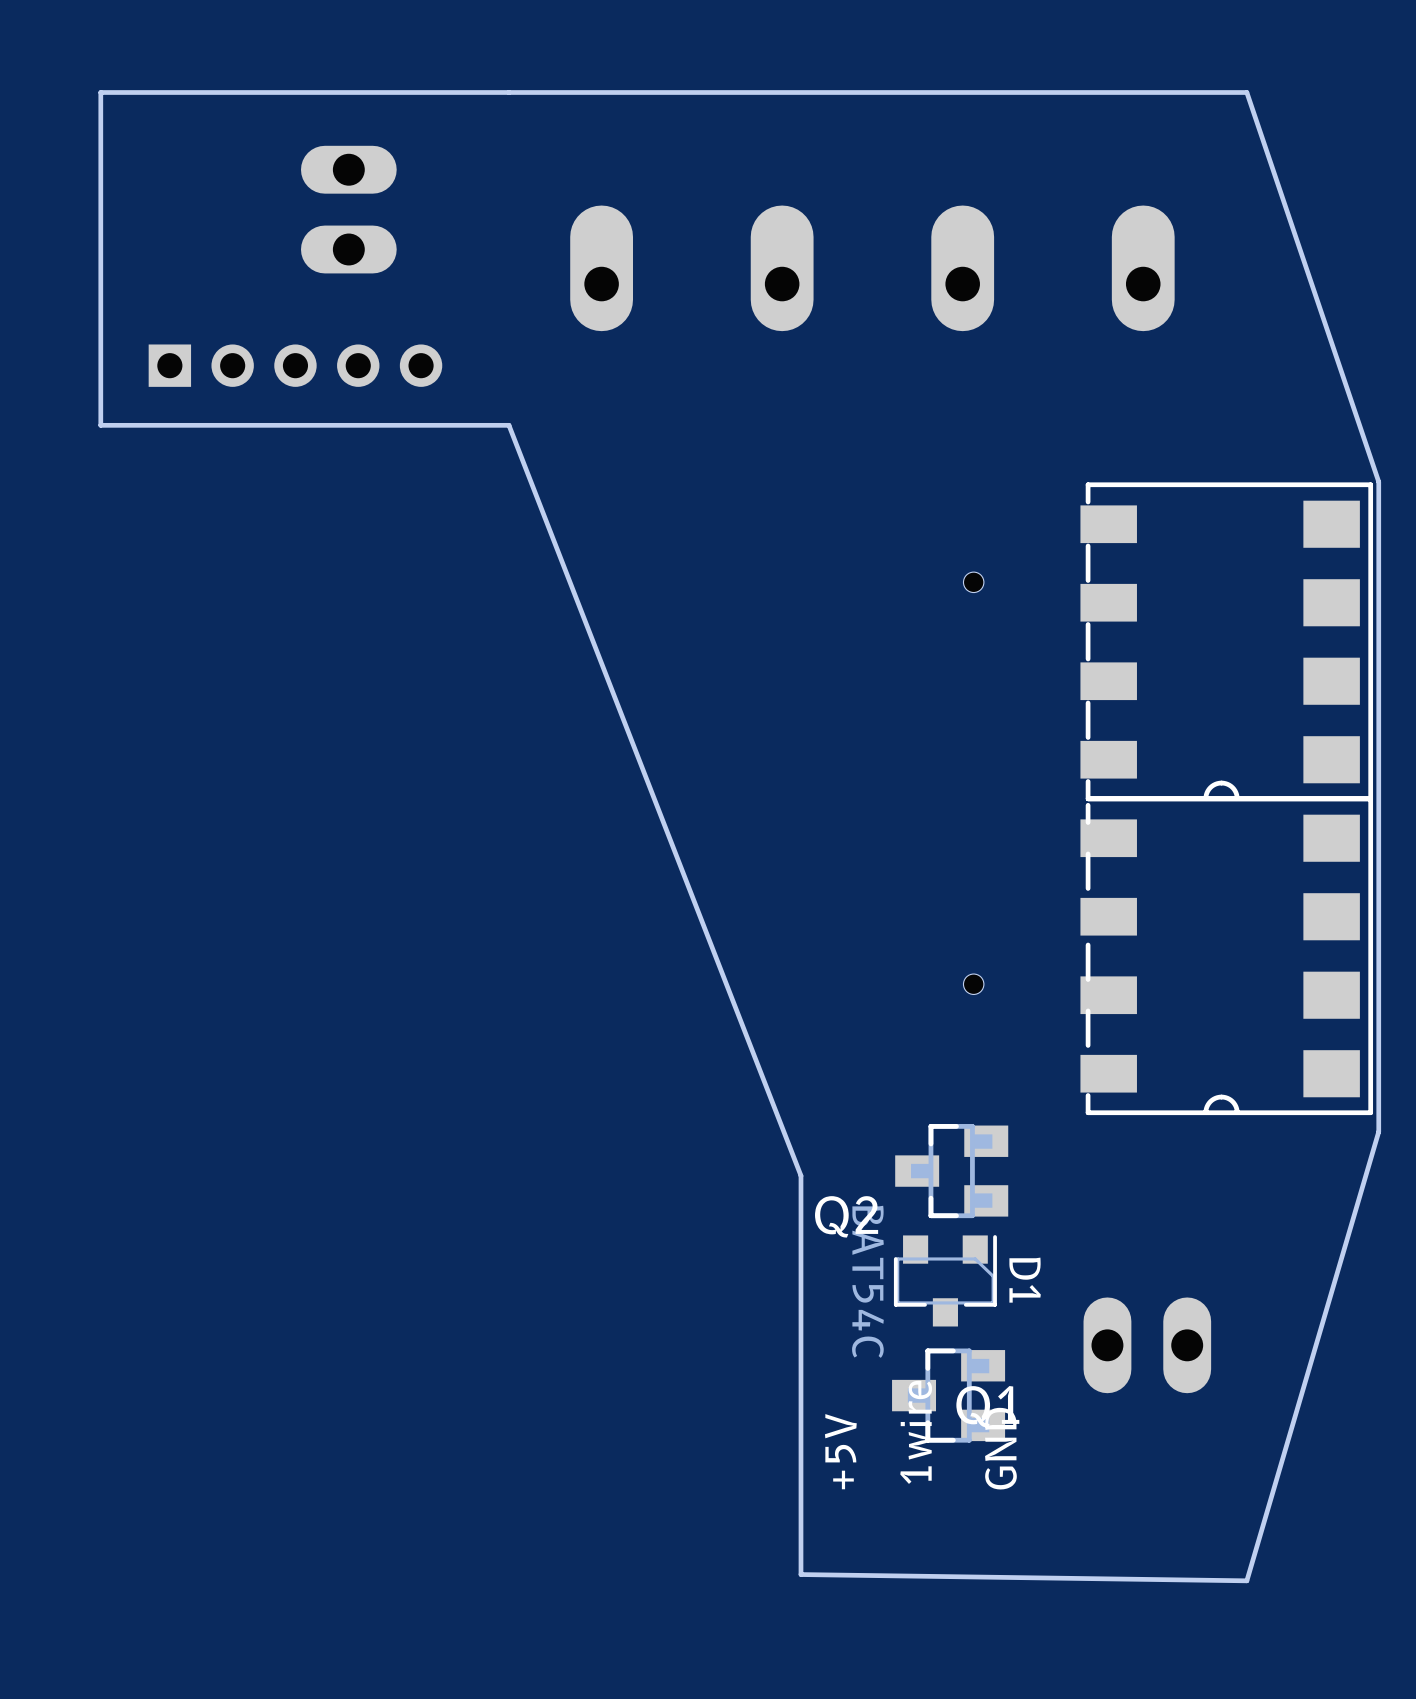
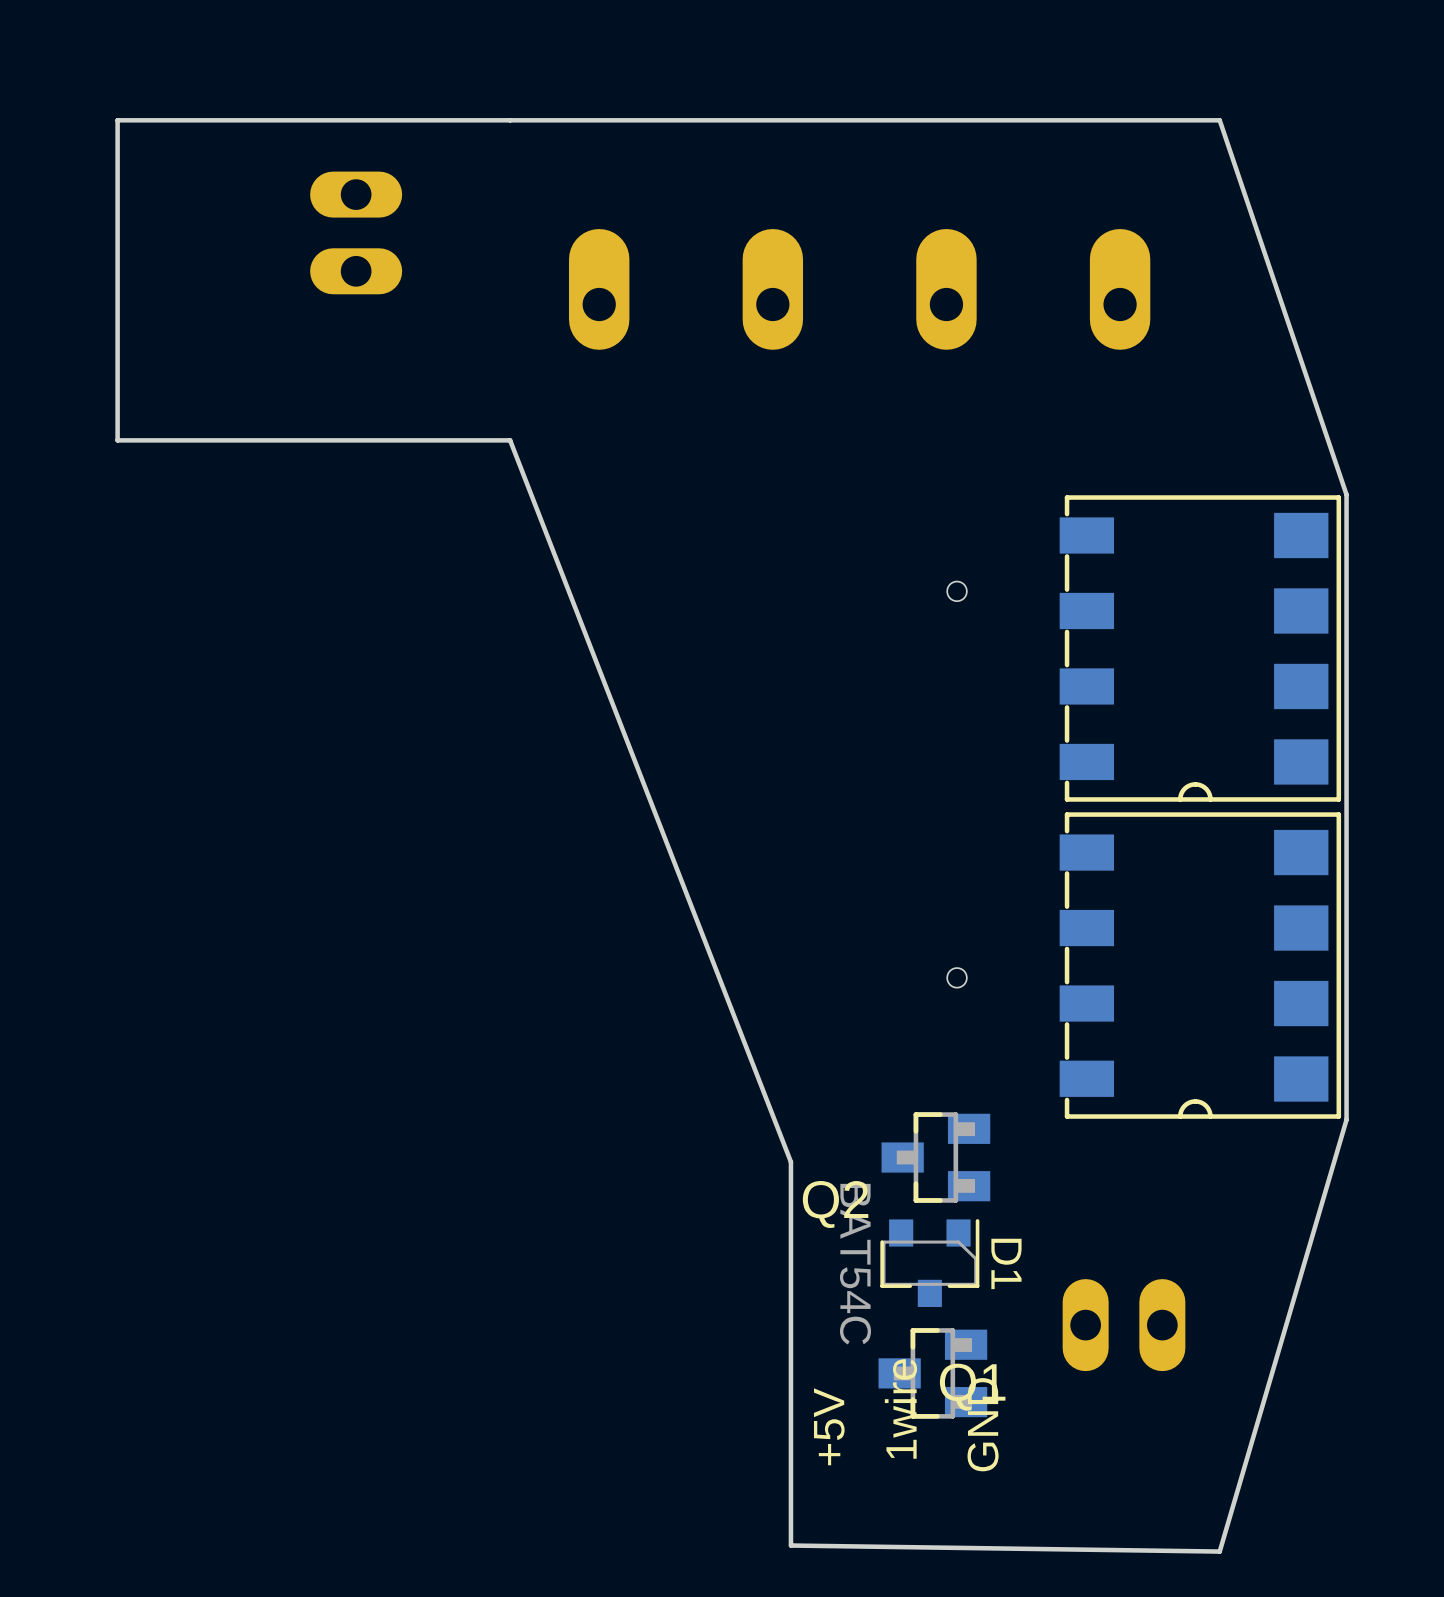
part: (295, 365) -> none
part footprint: [1080, 482, 1374, 1116] -> [1059, 495, 1342, 1119]

